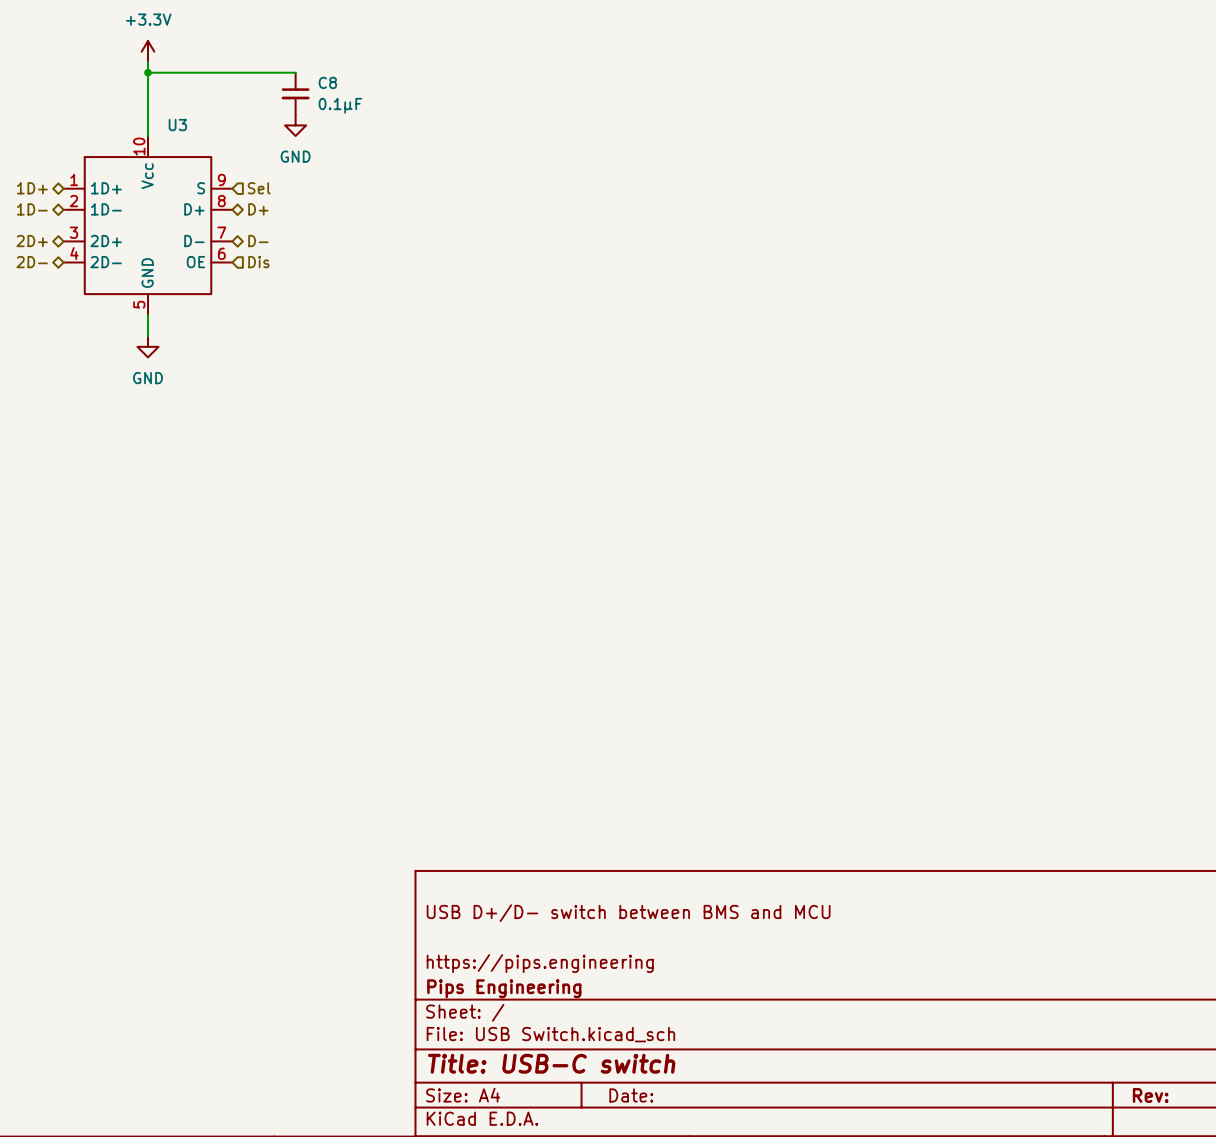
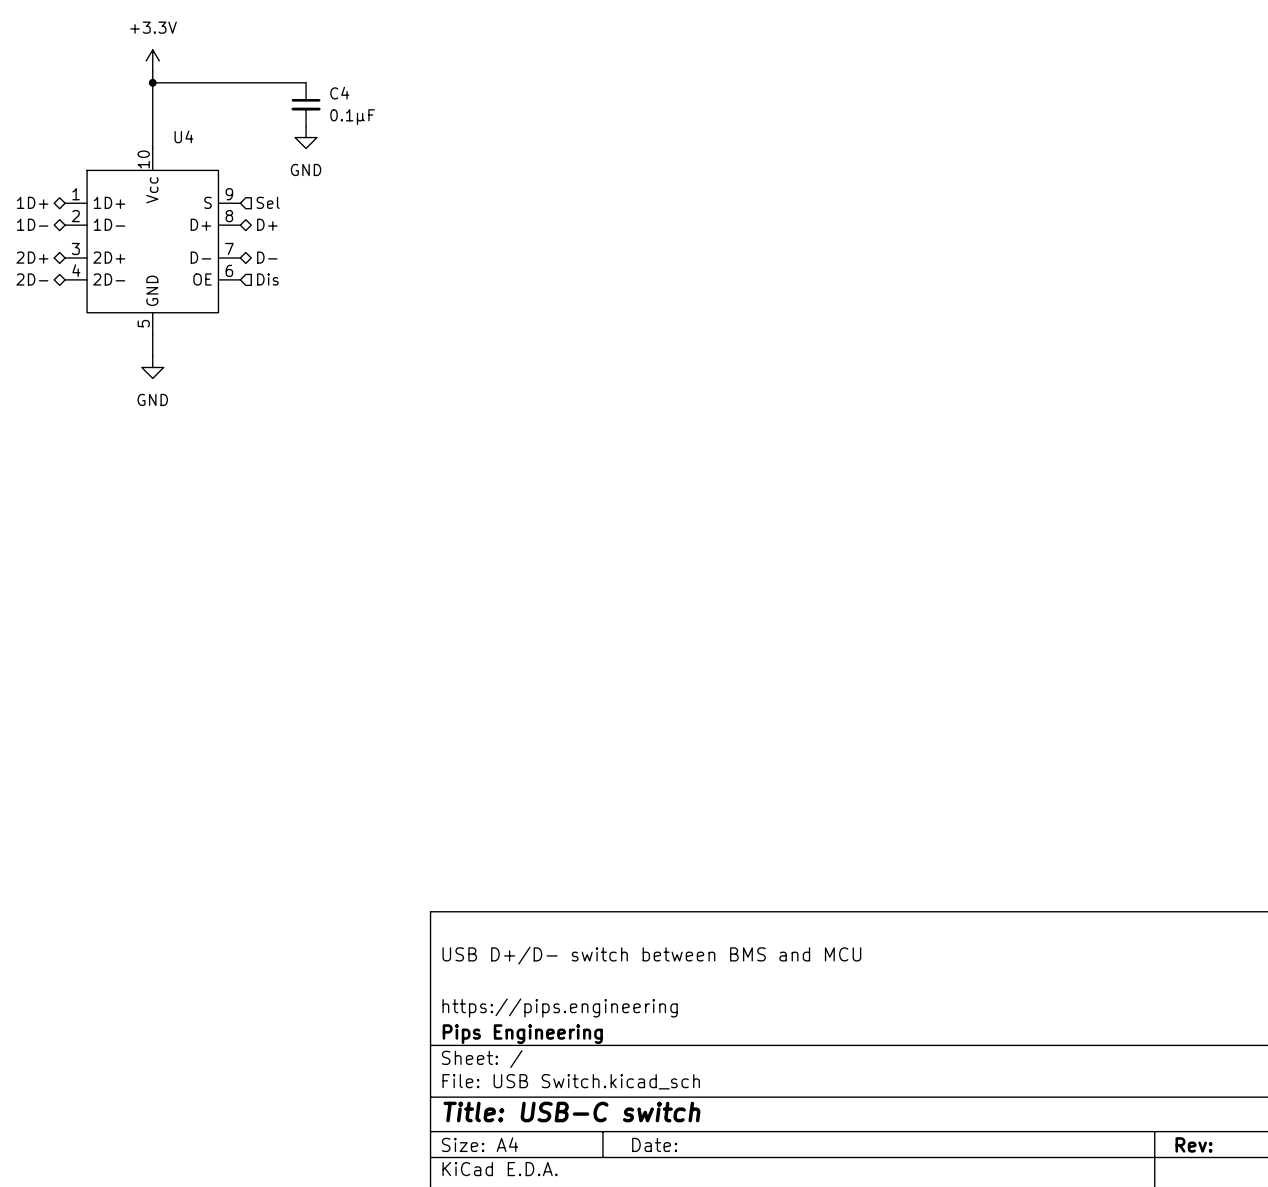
C8 name: C8 (327, 82) -> C4 (339, 93)
U3 name: U3 (177, 125) -> U4 (184, 136)

